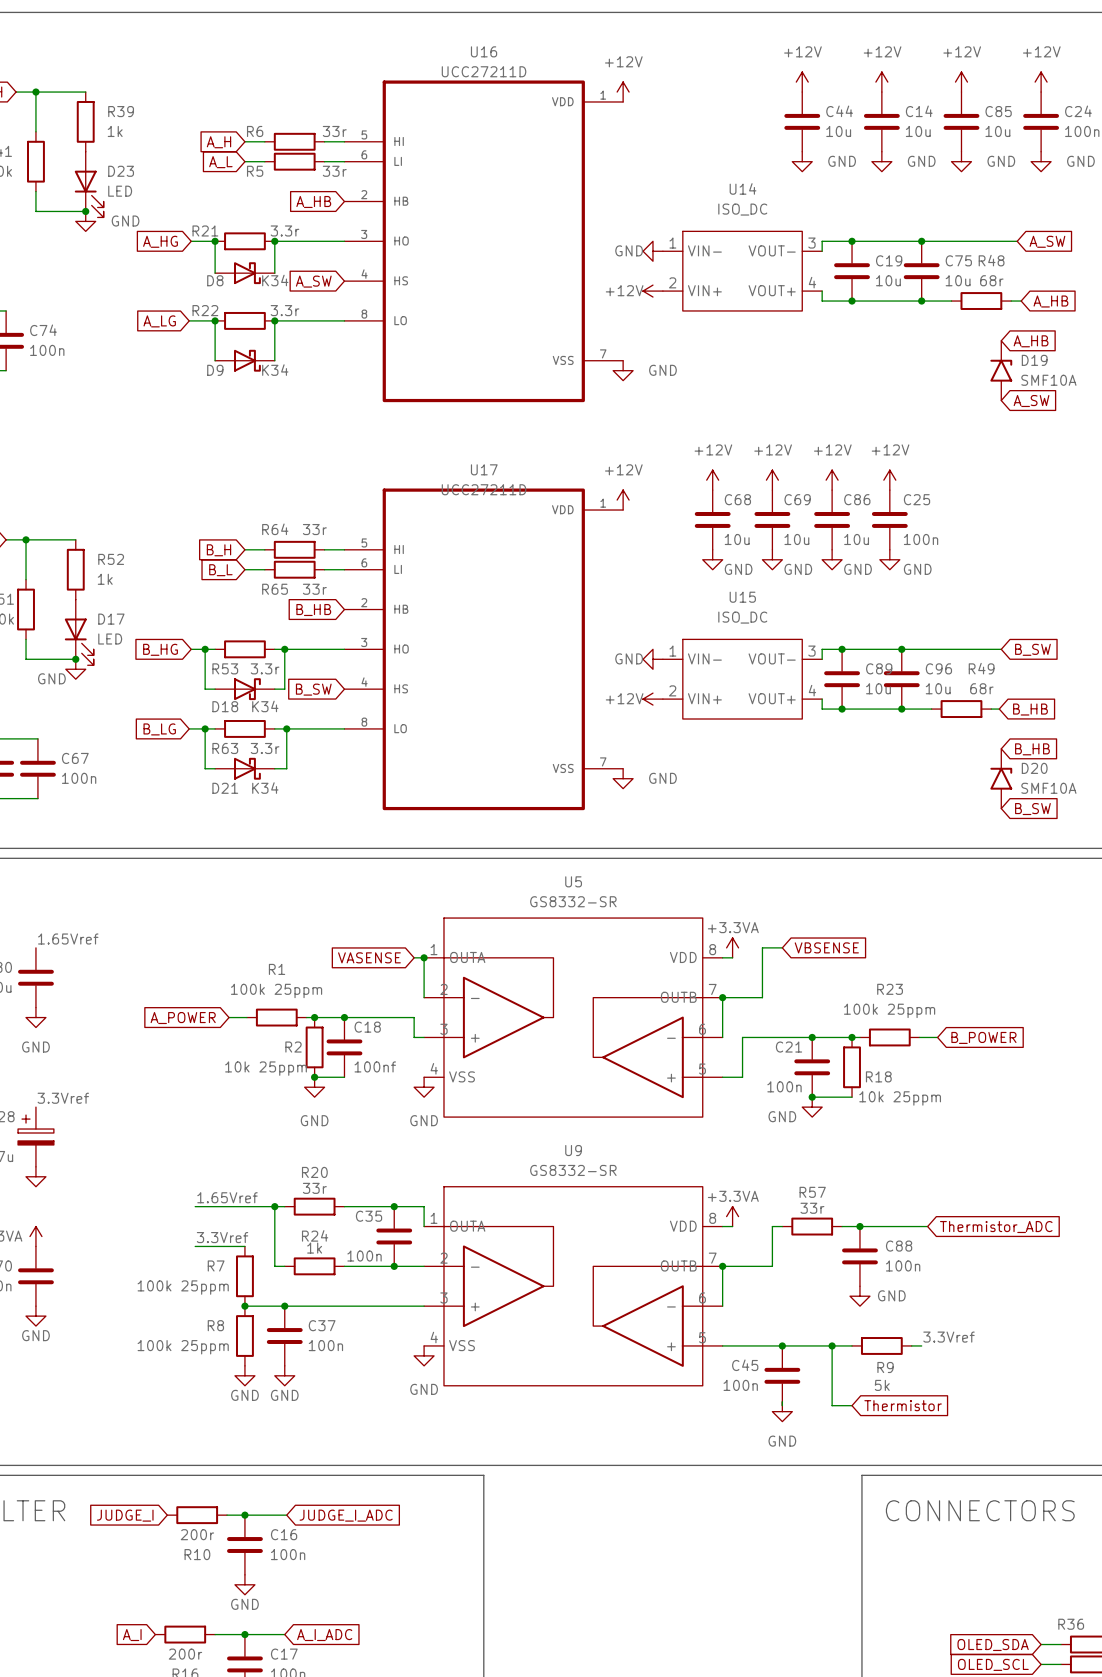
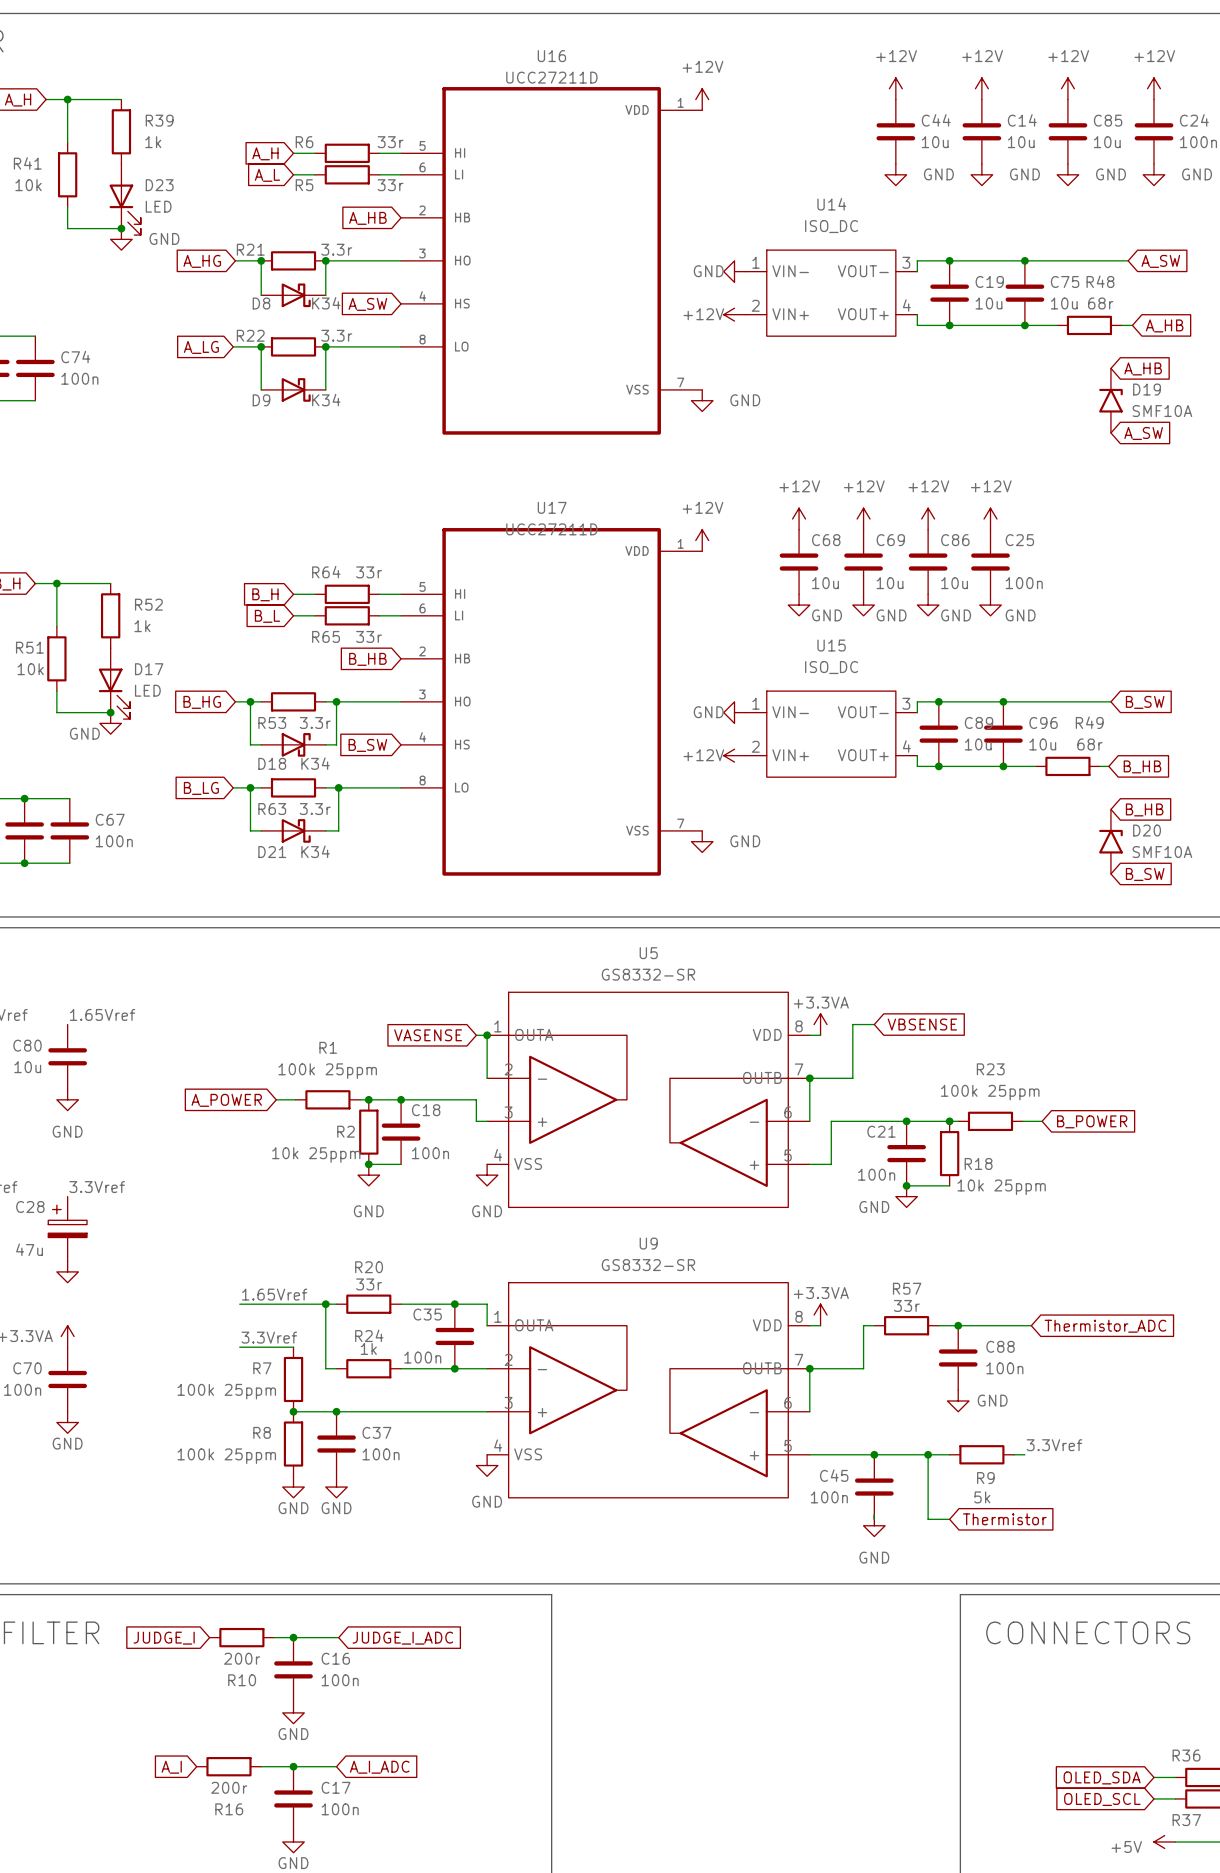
C18 value: 100nf (375, 1066) -> 100n (430, 1153)

